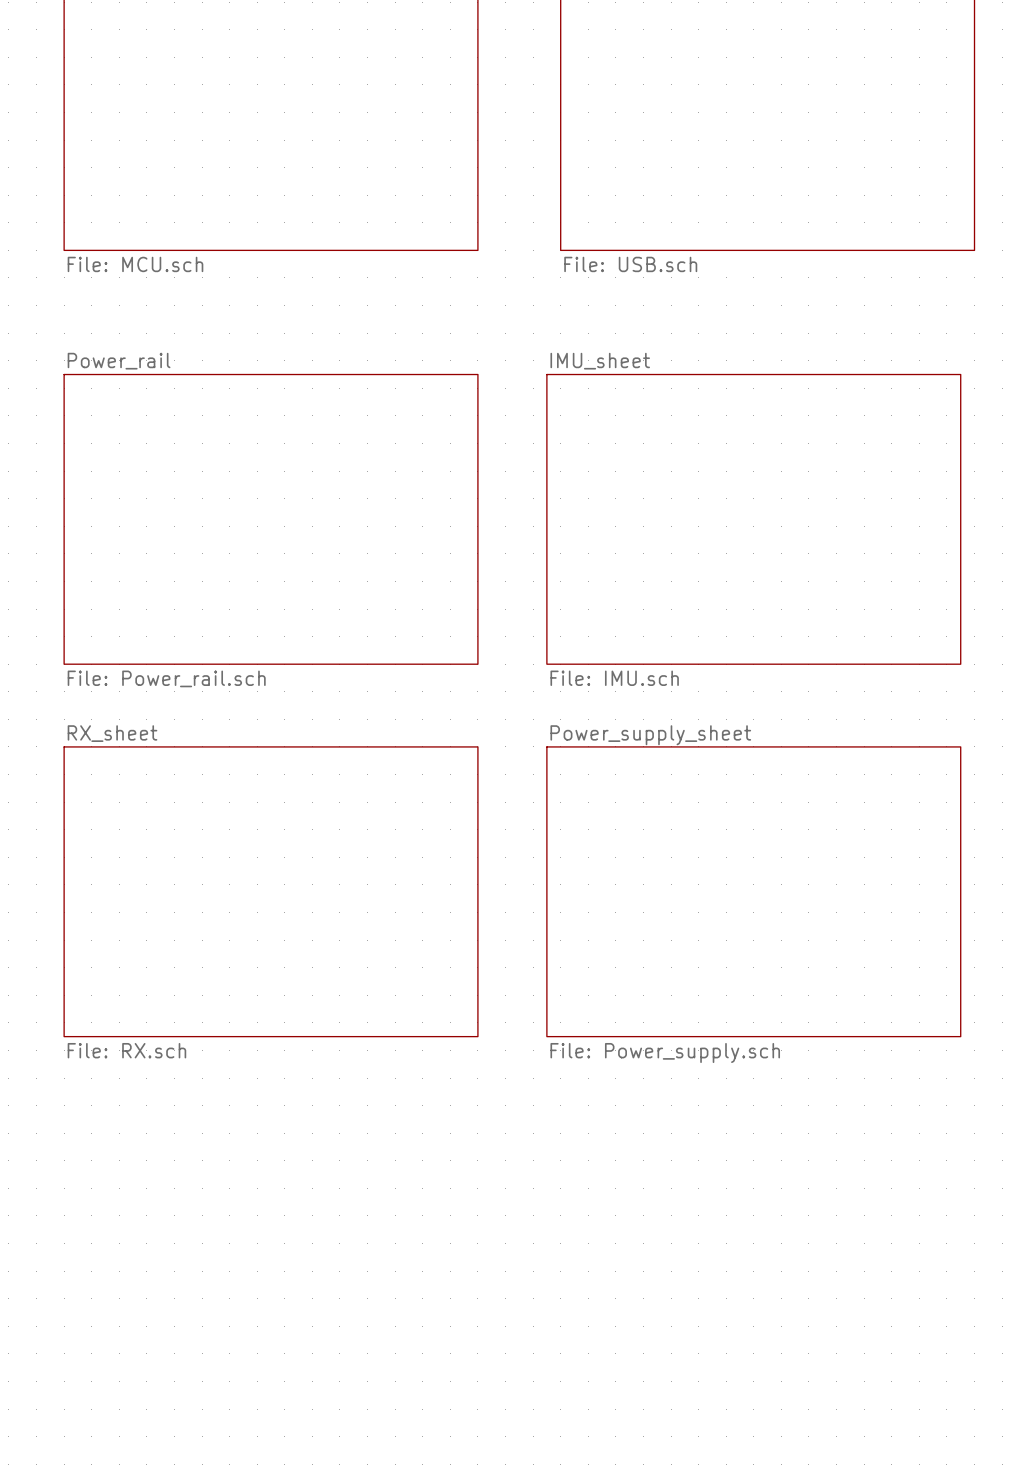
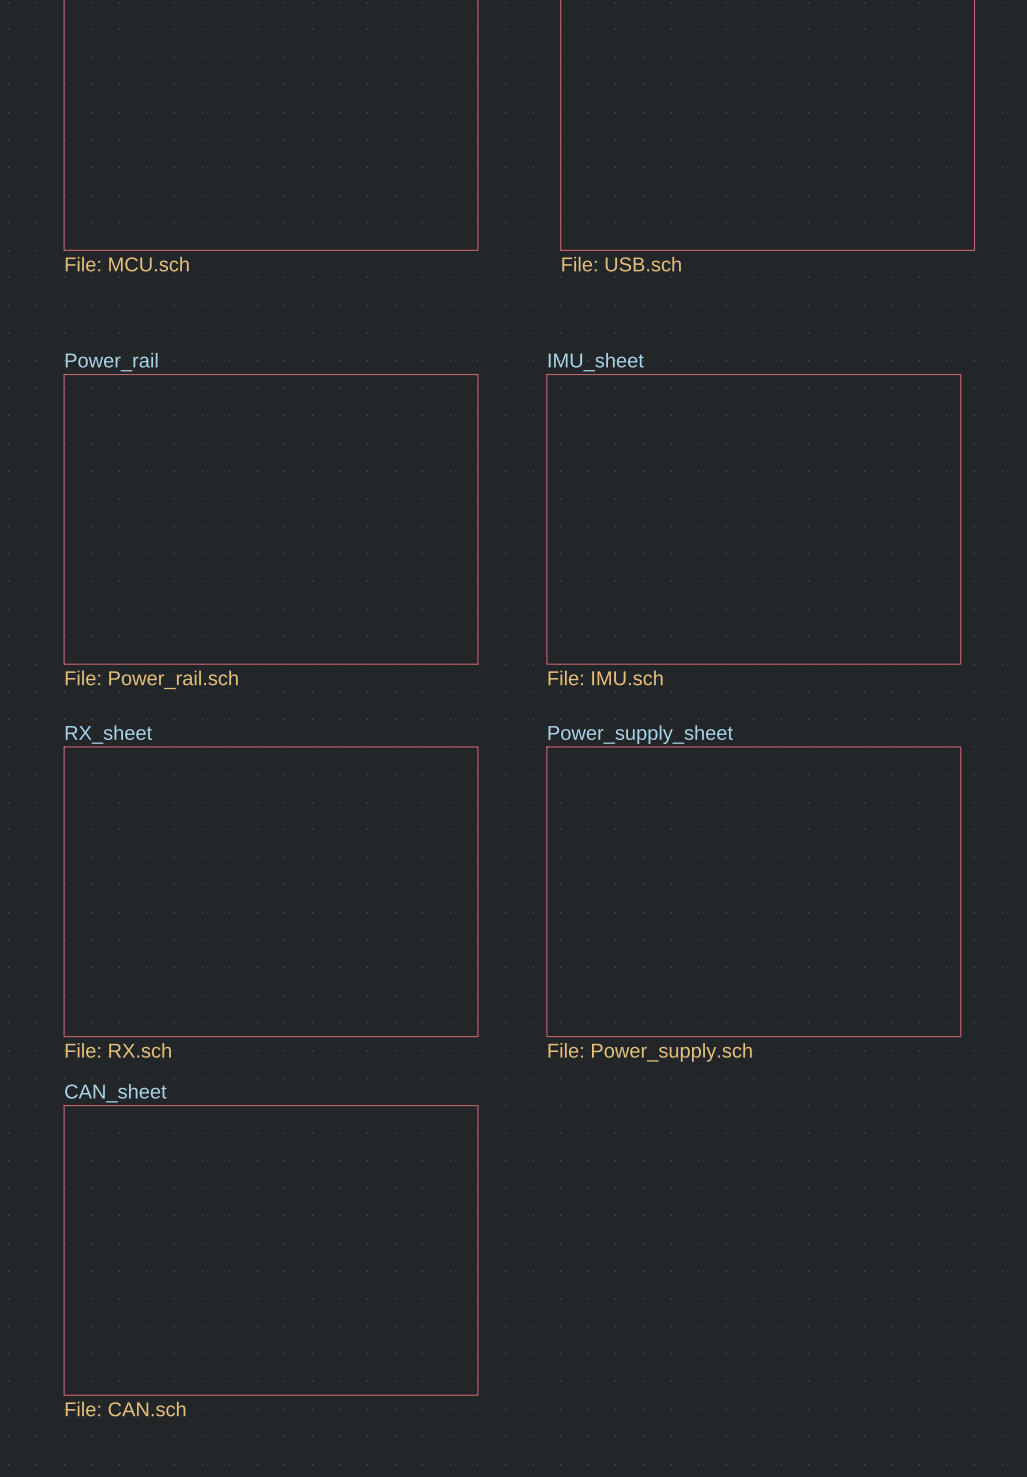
sheet CAN_sheet: none -> File: CAN.sch (271, 1250)

